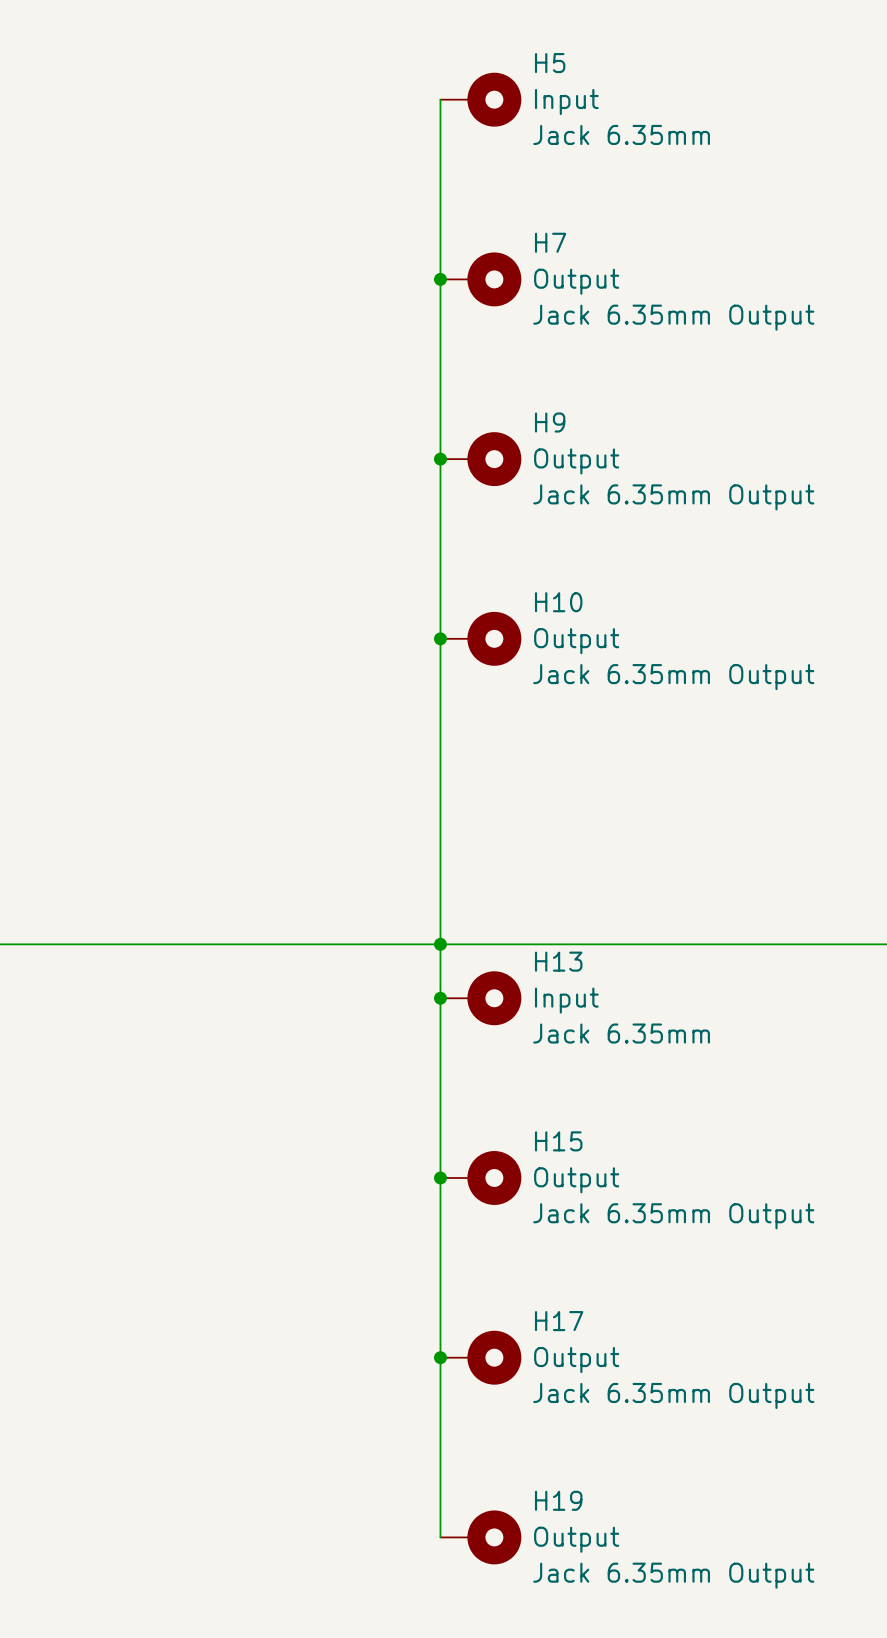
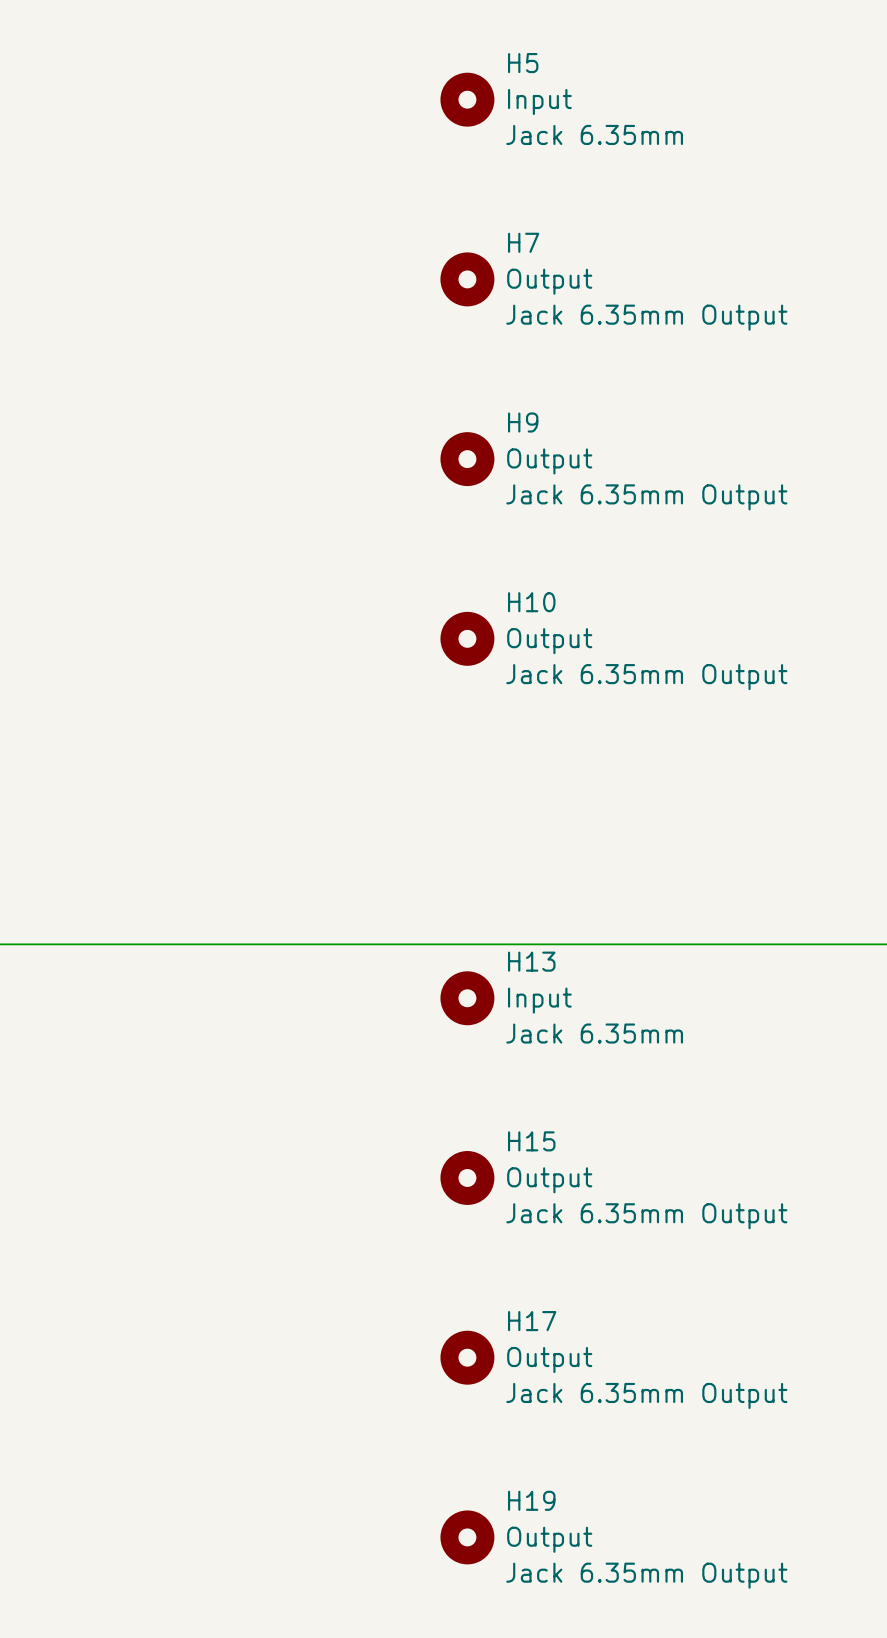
H5 symbol: [440, 72, 522, 127] -> [440, 72, 495, 127]
wire: (440, 99) (440, 1537) -> none
H7 symbol: [440, 252, 522, 307] -> [440, 252, 495, 307]
junction: (440, 279) -> none
H9 symbol: [440, 432, 522, 487] -> [440, 432, 495, 487]
junction: (440, 459) -> none
H10 symbol: [440, 611, 522, 666] -> [440, 611, 495, 666]
junction: (440, 638) -> none
junction: (440, 944) -> none
H13 symbol: [440, 971, 522, 1026] -> [440, 971, 495, 1026]
junction: (440, 998) -> none
H15 symbol: [440, 1151, 522, 1205] -> [440, 1151, 495, 1205]
junction: (440, 1177) -> none
H17 symbol: [440, 1330, 522, 1385] -> [440, 1330, 495, 1385]
junction: (440, 1357) -> none
H19 symbol: [440, 1510, 522, 1565] -> [440, 1510, 495, 1565]

